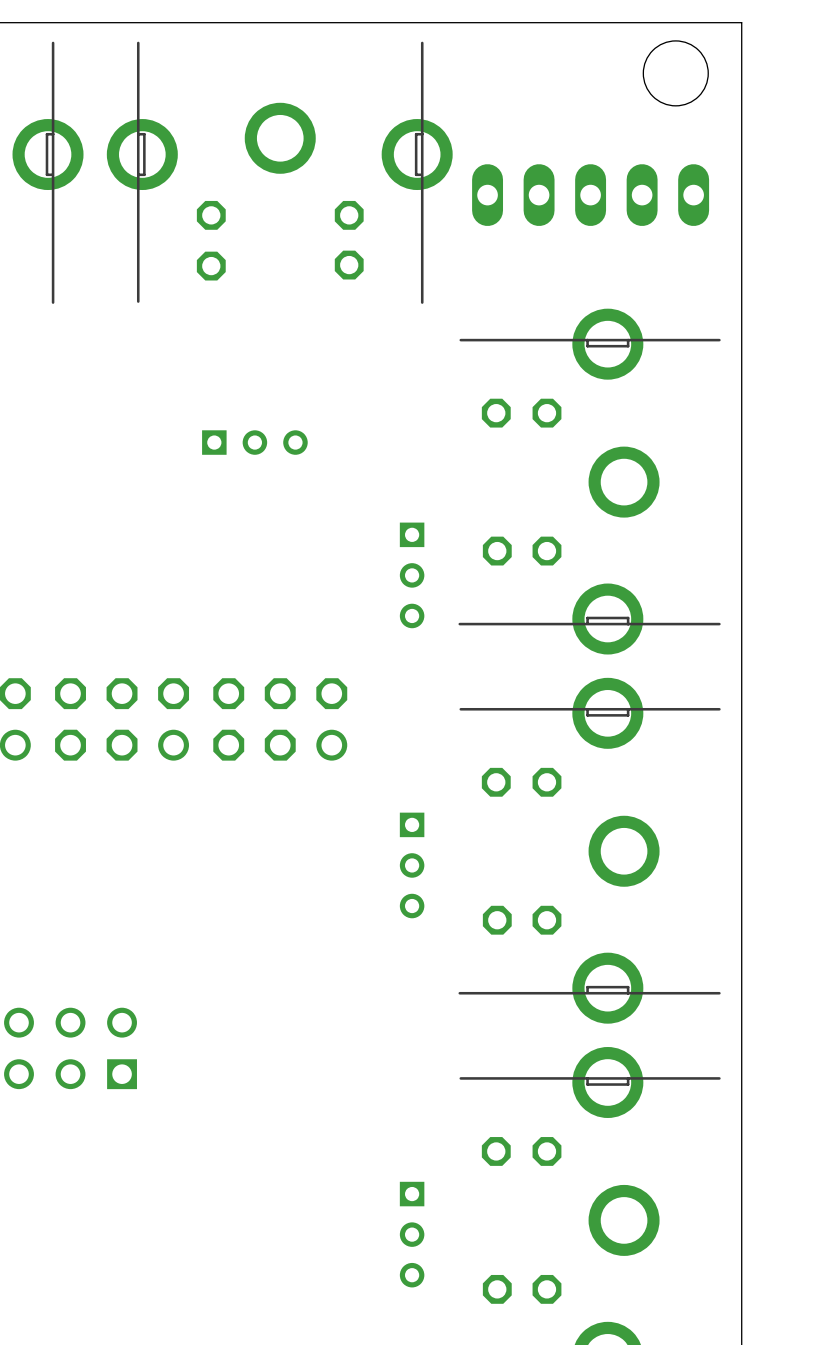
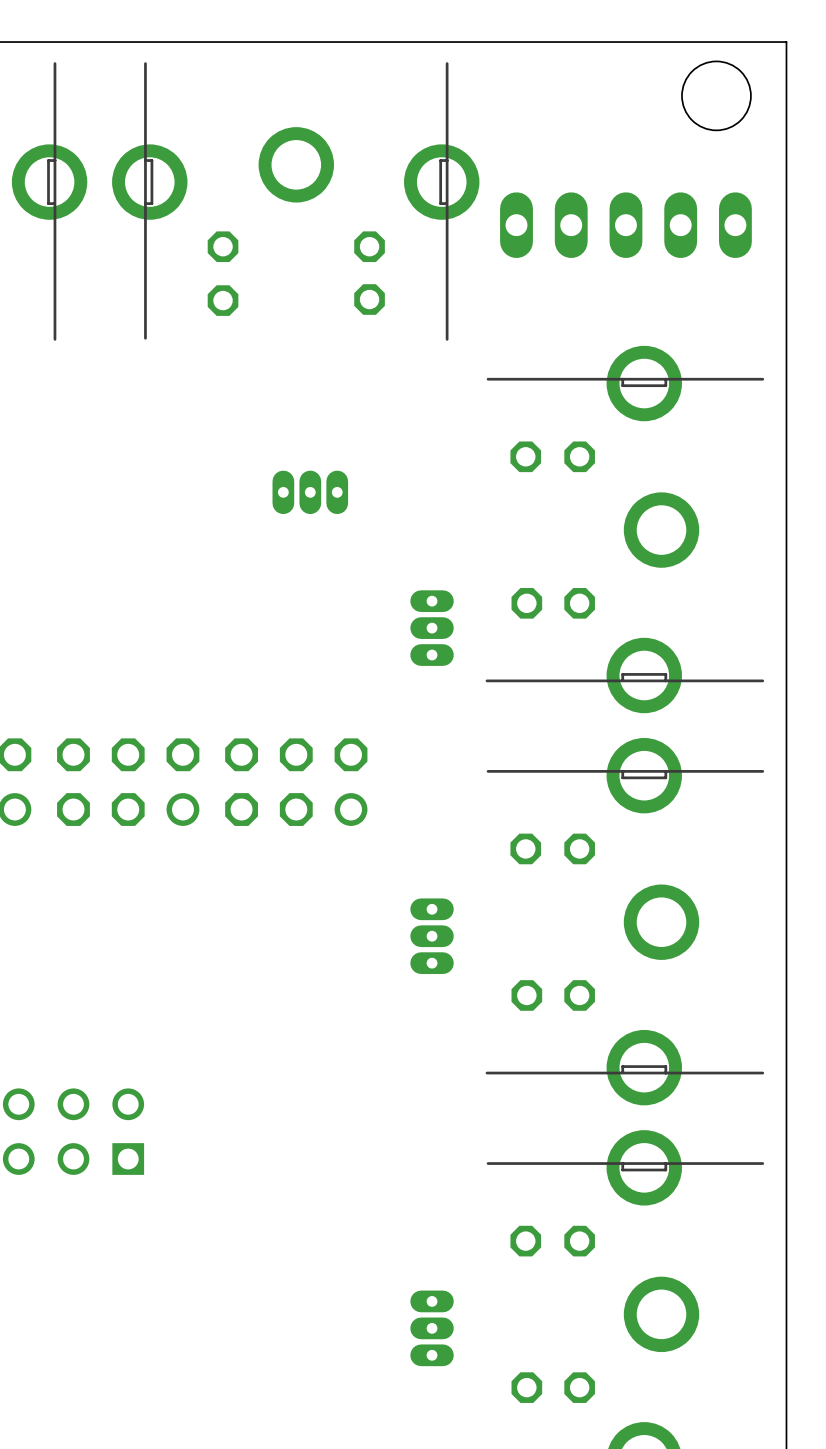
part: (254, 442) -> none
part: none -> (310, 492)
part footprint: [399, 522, 425, 629] -> [410, 590, 454, 666]
part footprint: [399, 812, 425, 919] -> [410, 898, 454, 975]
part footprint: [399, 1181, 425, 1288] -> [410, 1290, 454, 1367]

